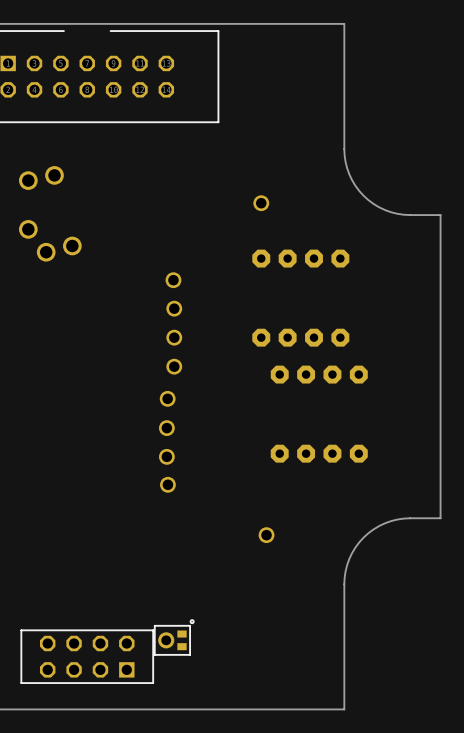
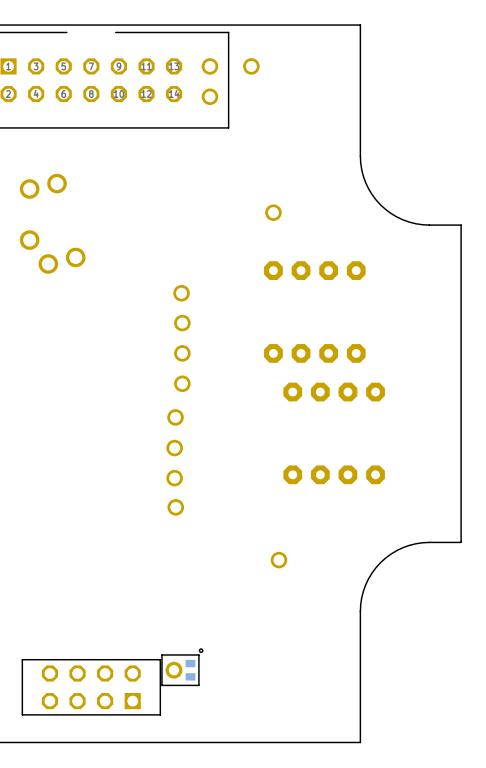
part: none -> (209, 66)
part: none -> (251, 66)
part: none -> (209, 96)

